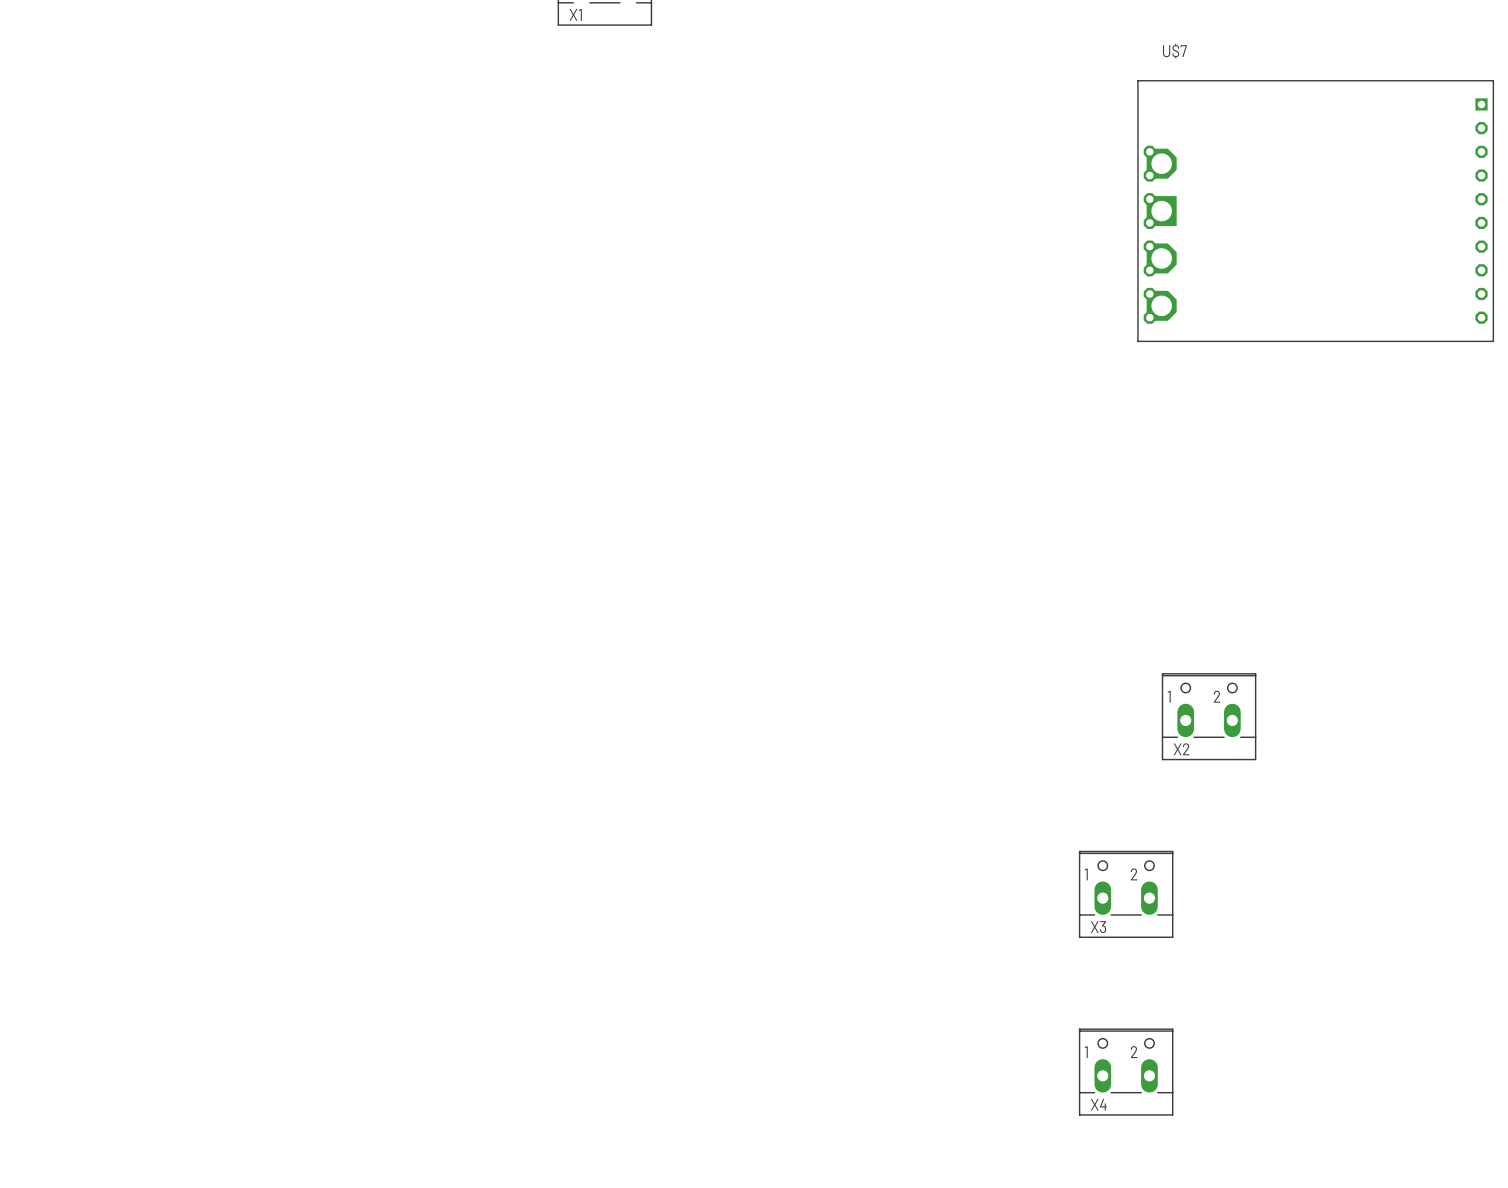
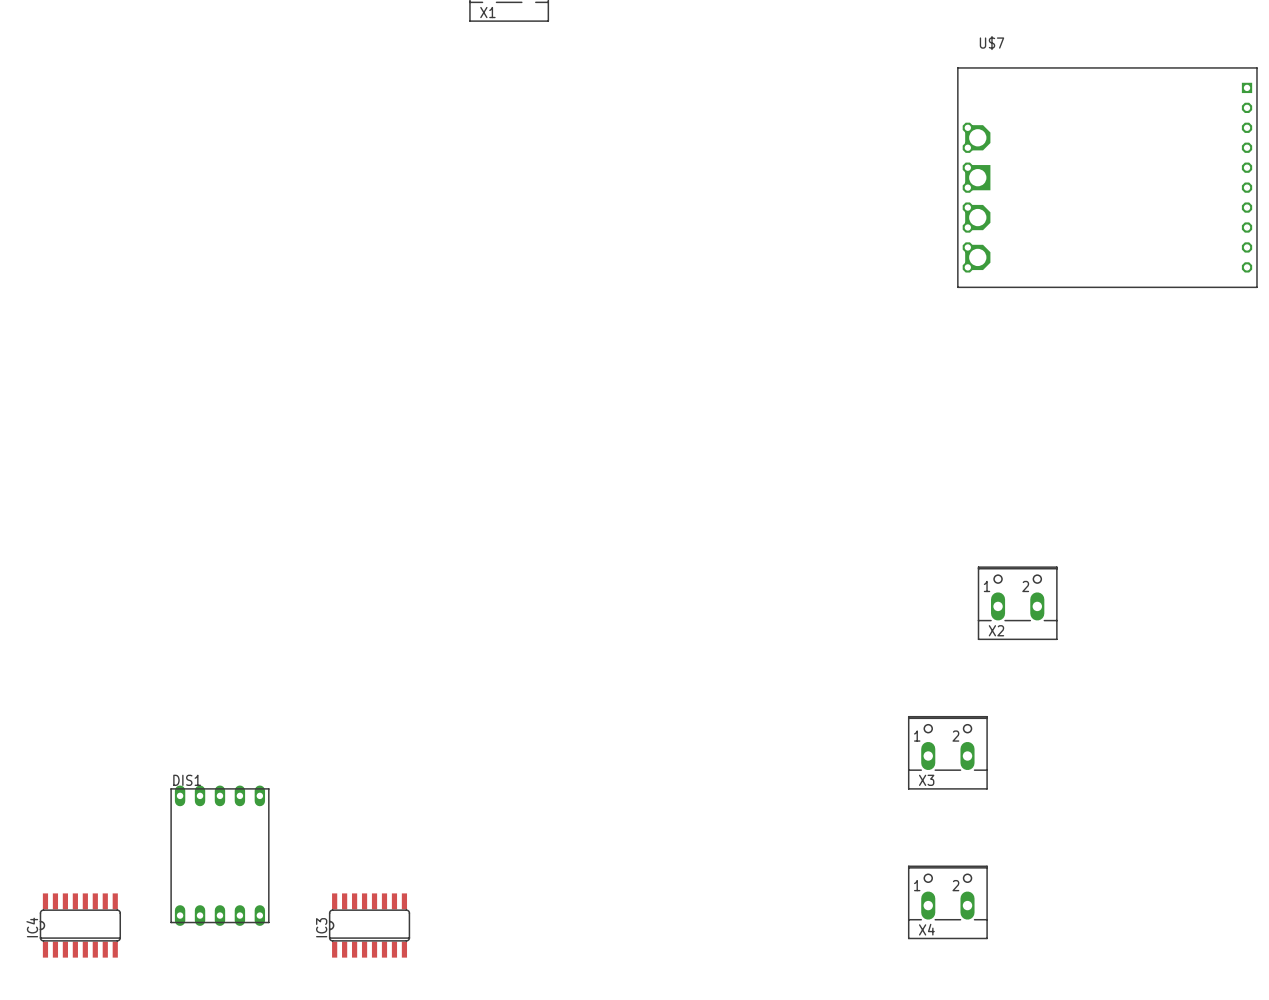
DIS1: none -> (219, 855)
IC4: none -> (80, 925)
IC3: none -> (369, 925)

